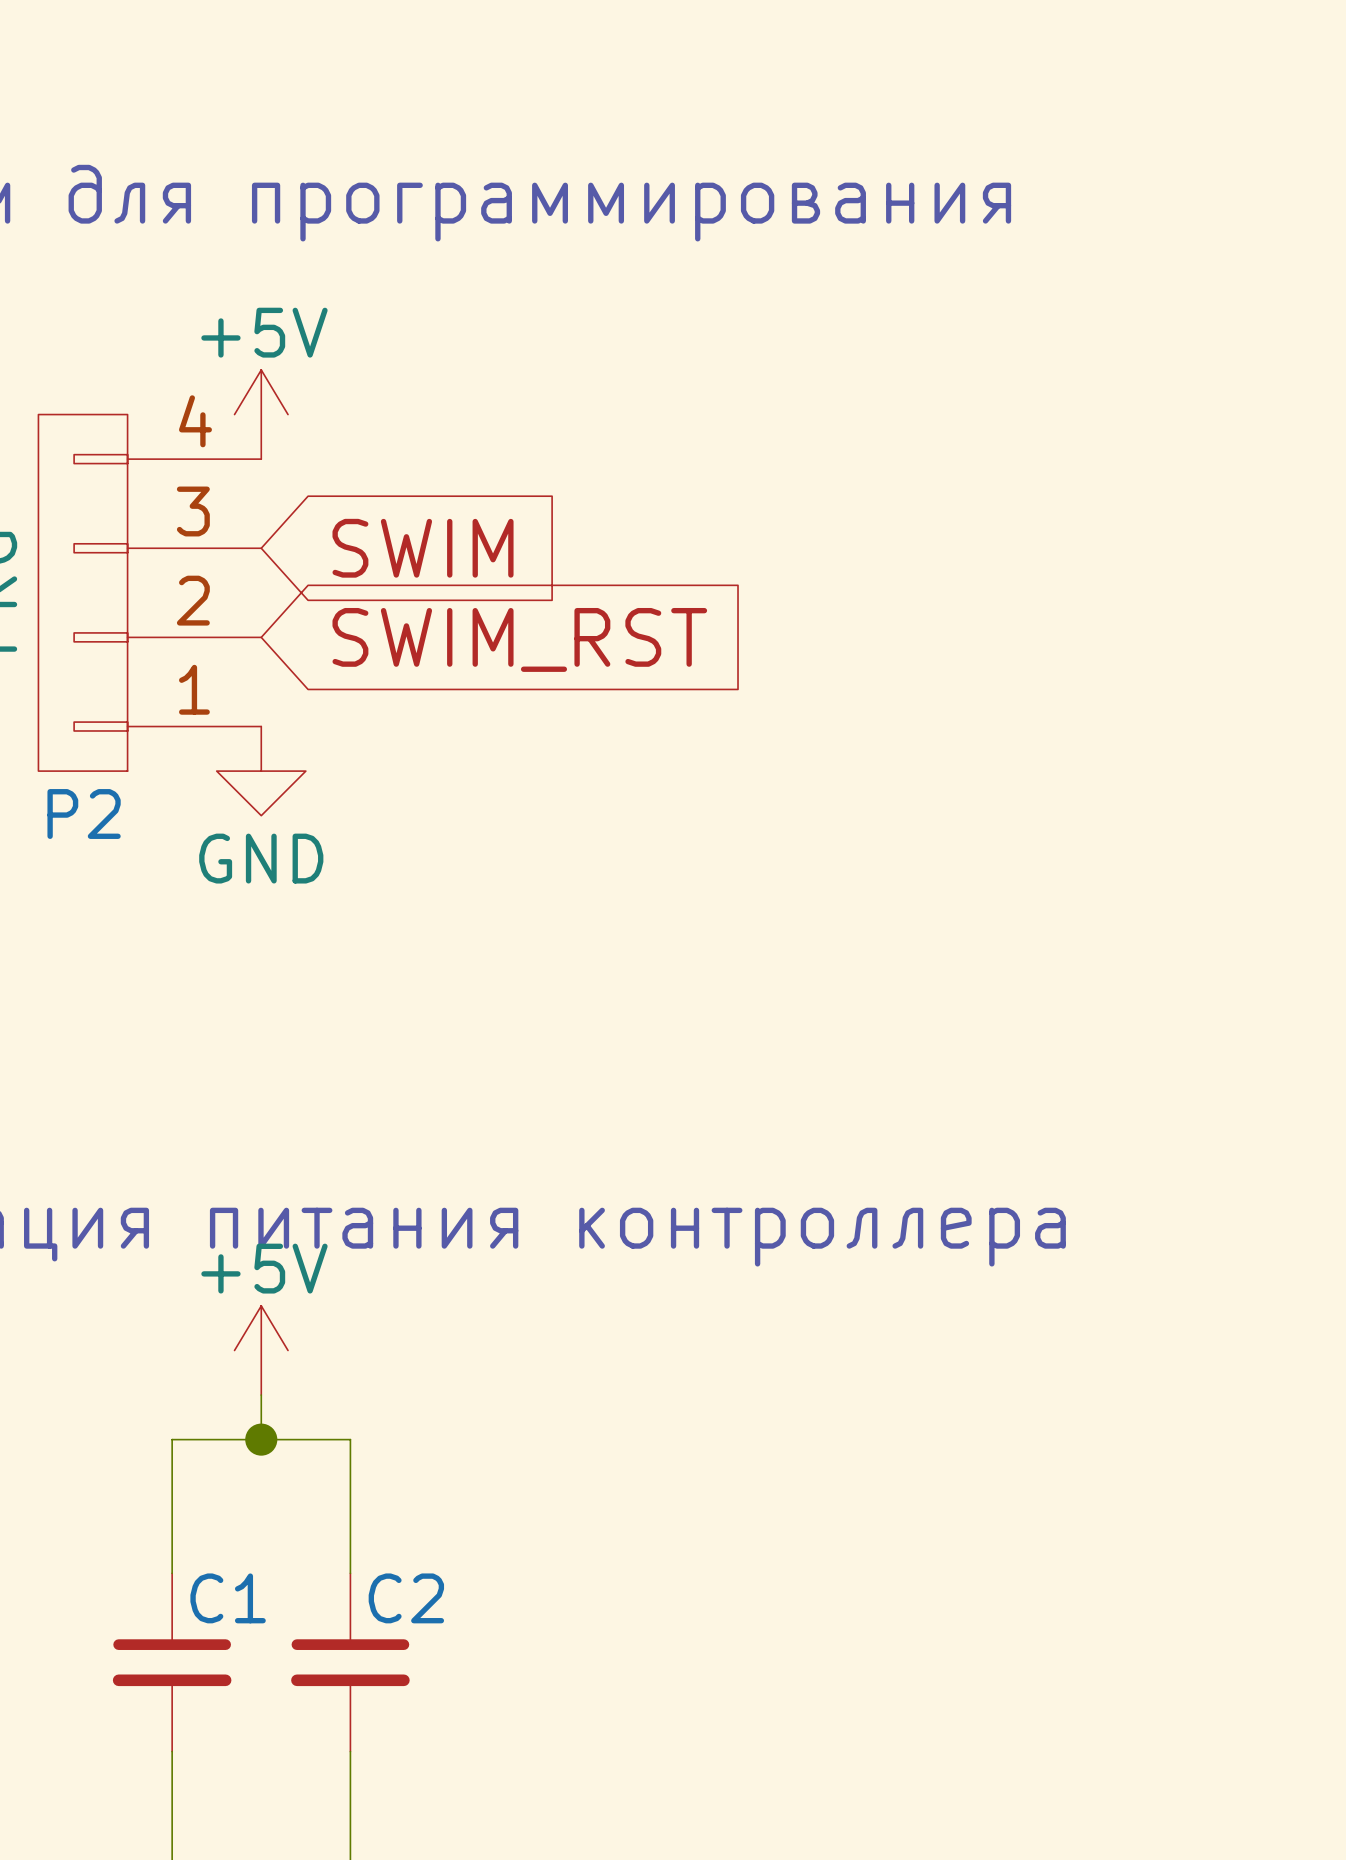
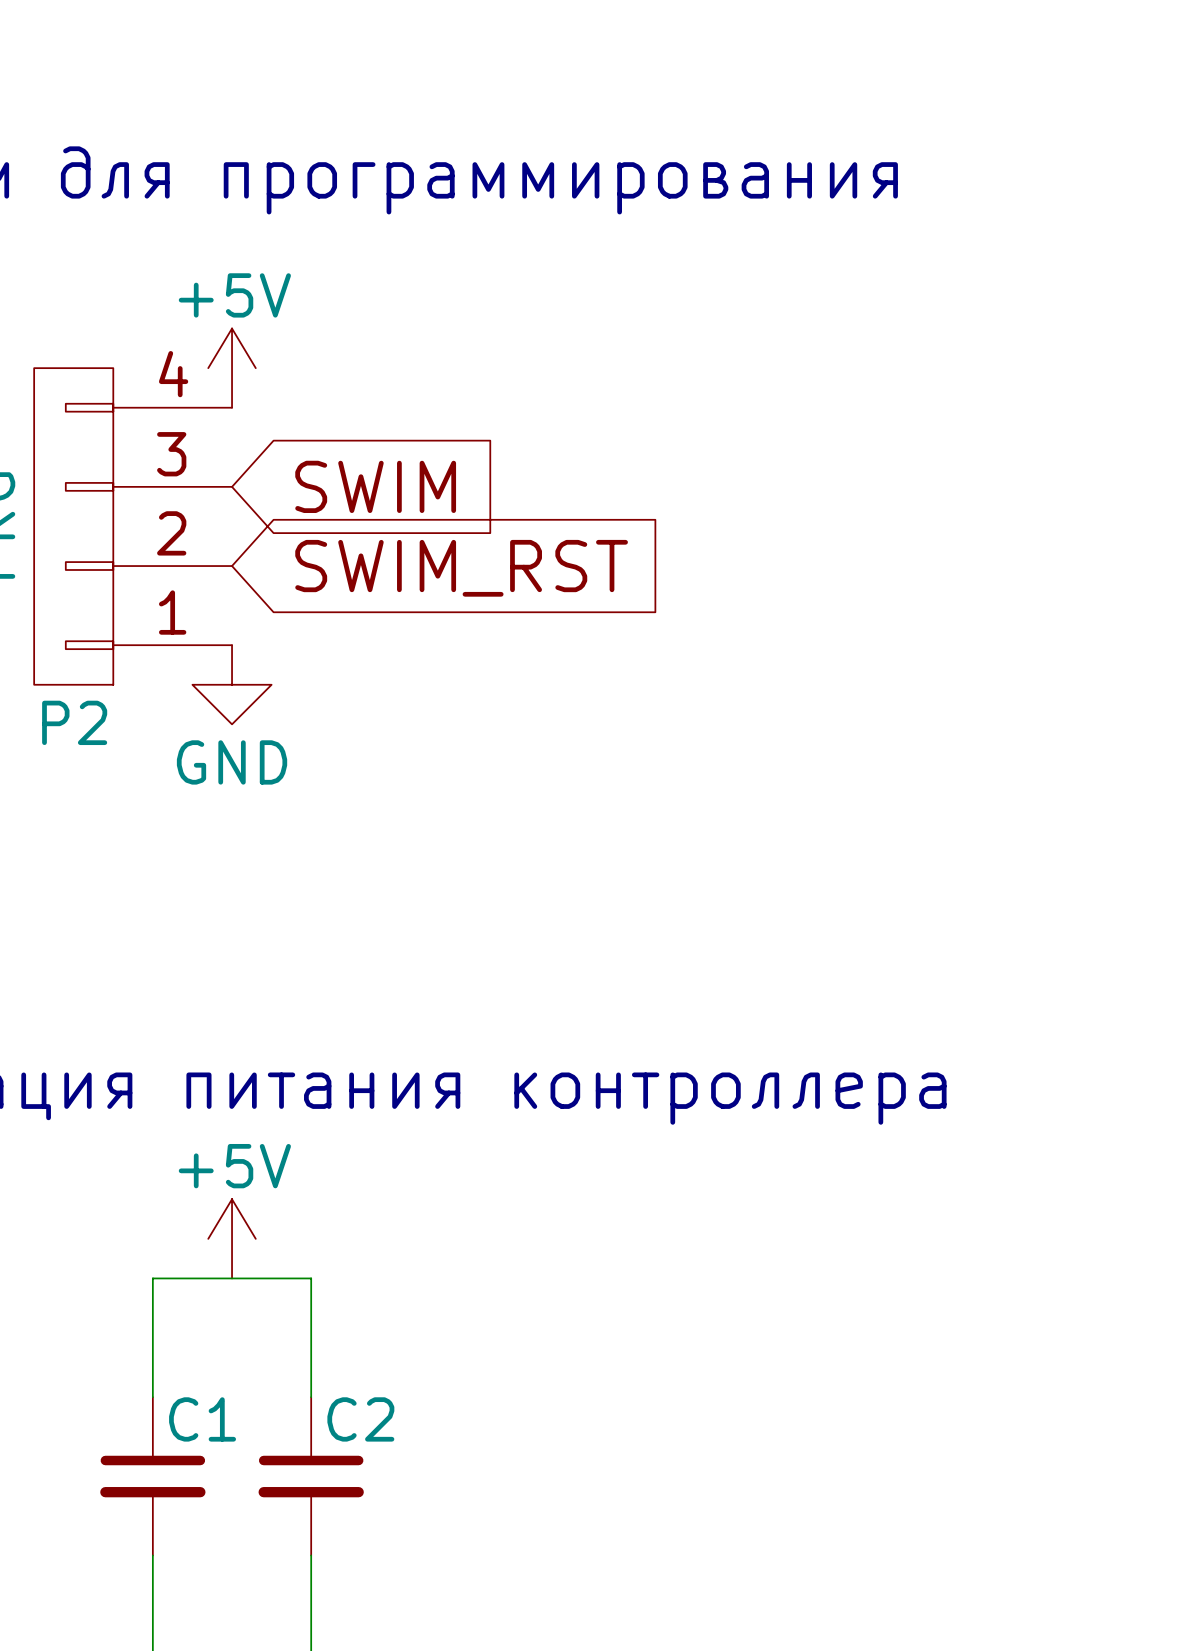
power symbol position: +5V (261, 1350) -> +5V (232, 1238)
junction: (261, 1439) -> none

